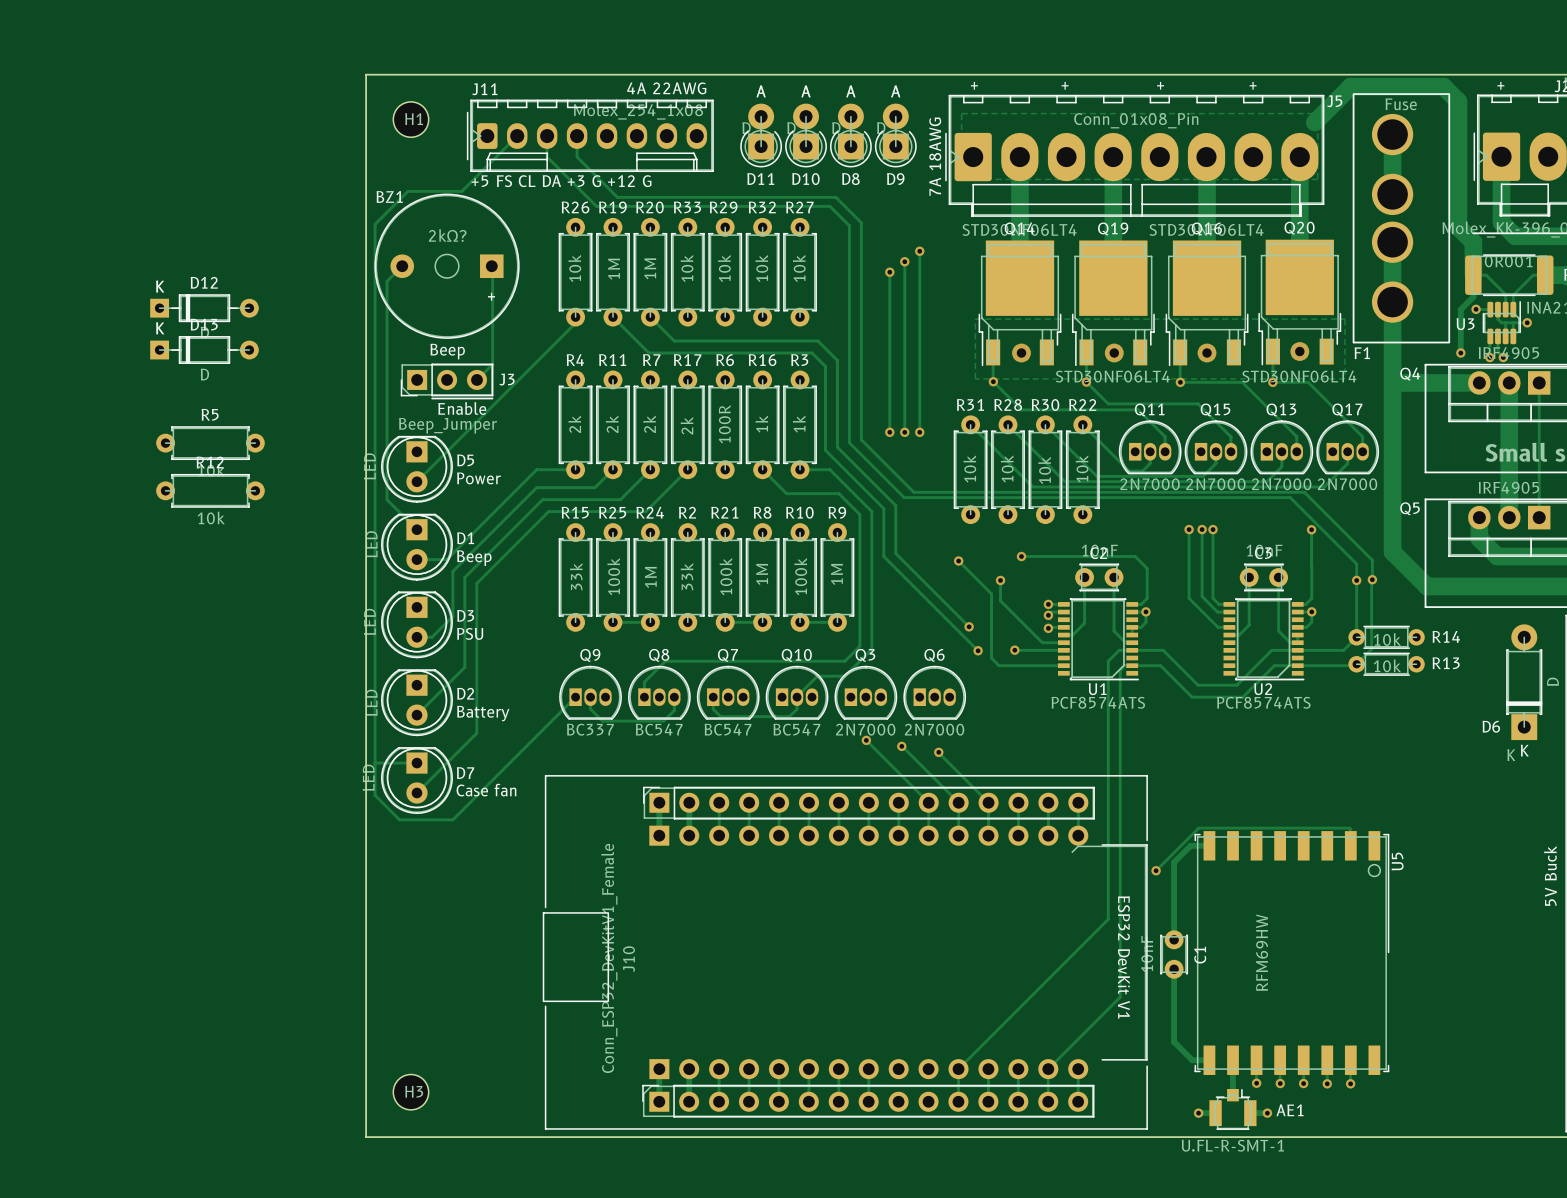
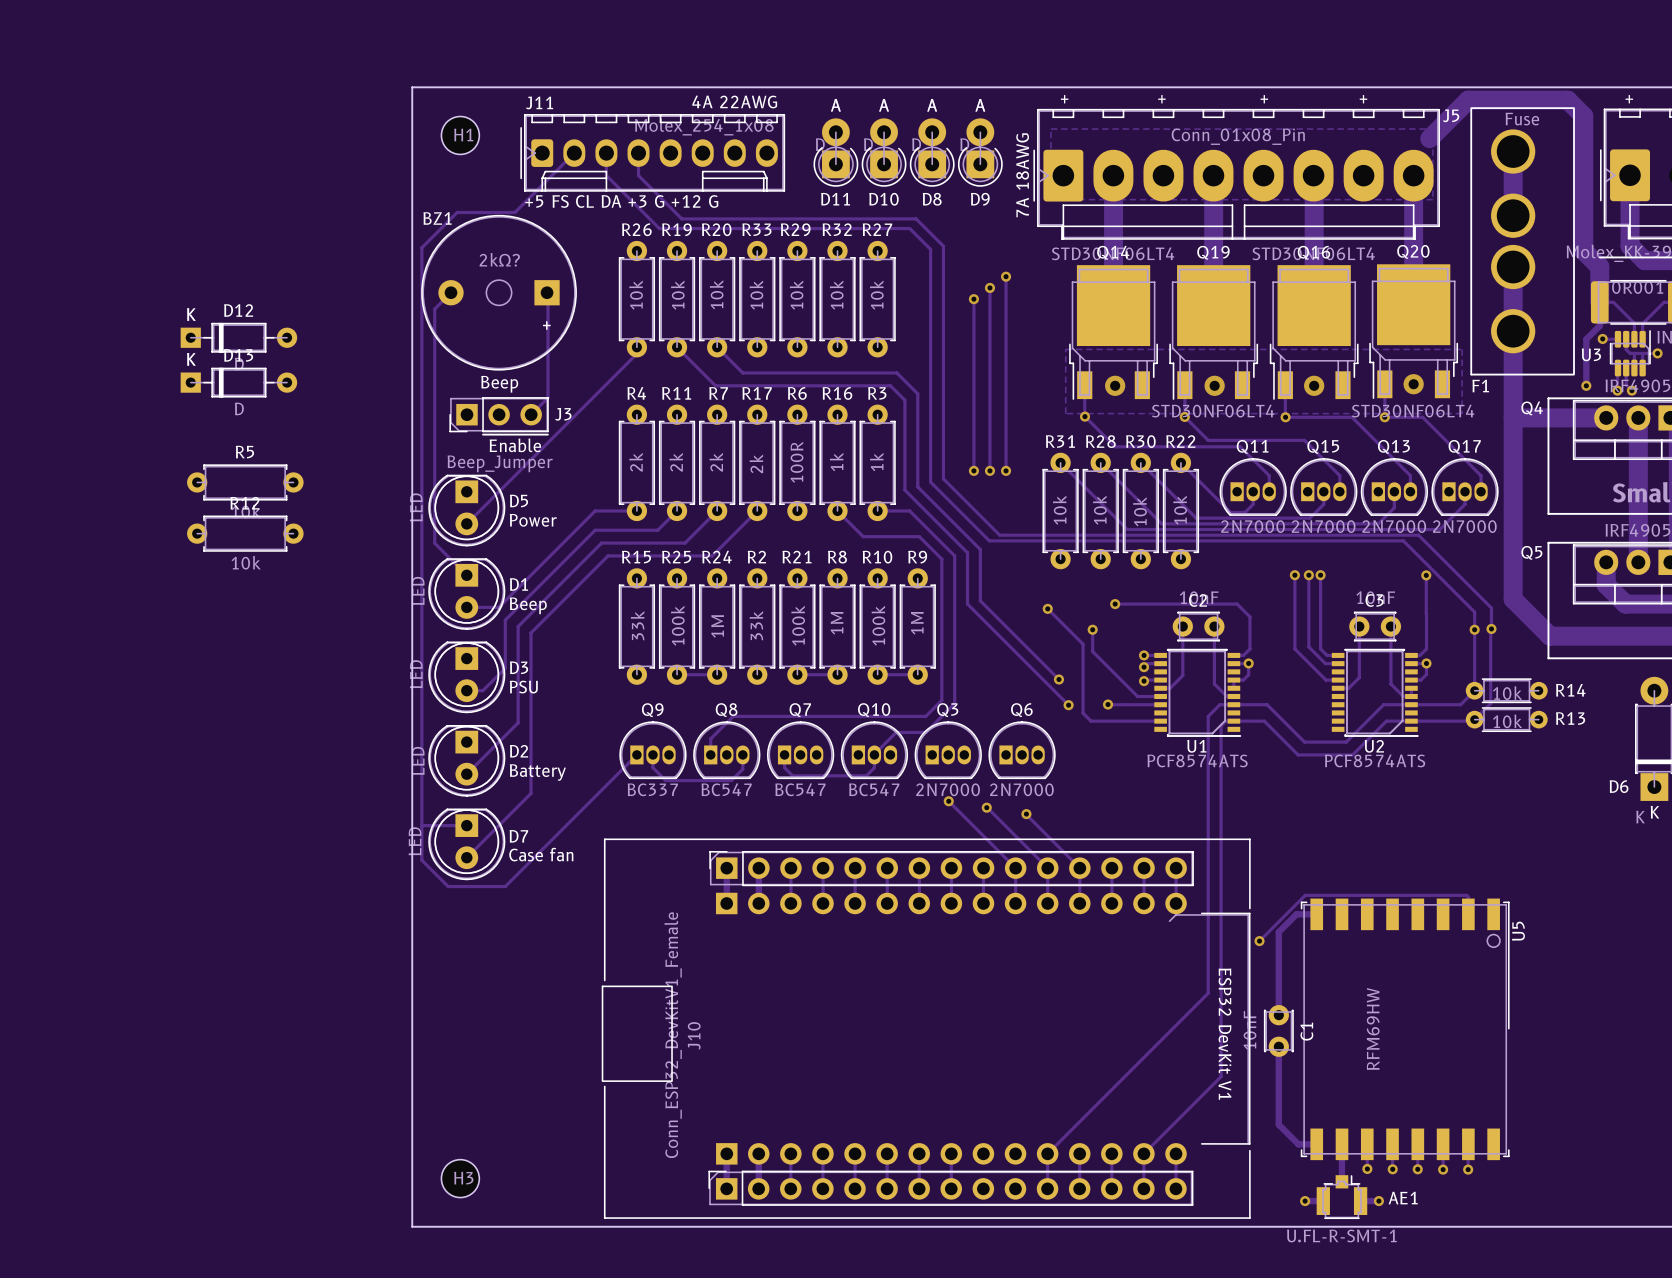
R20 value: 1M (650, 268) -> 10k (716, 294)
R19 value: 1M (614, 269) -> 10k (677, 295)

